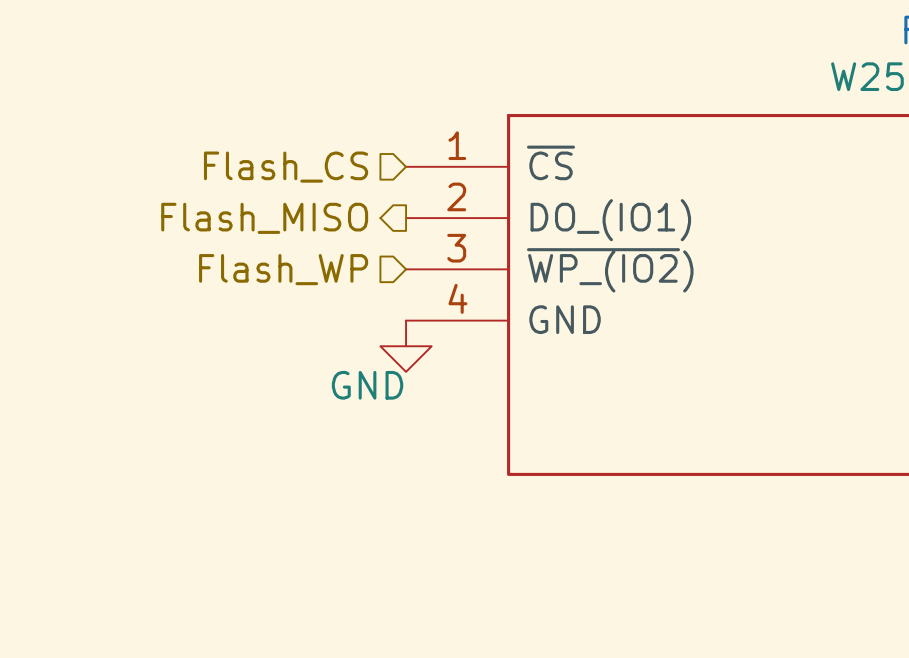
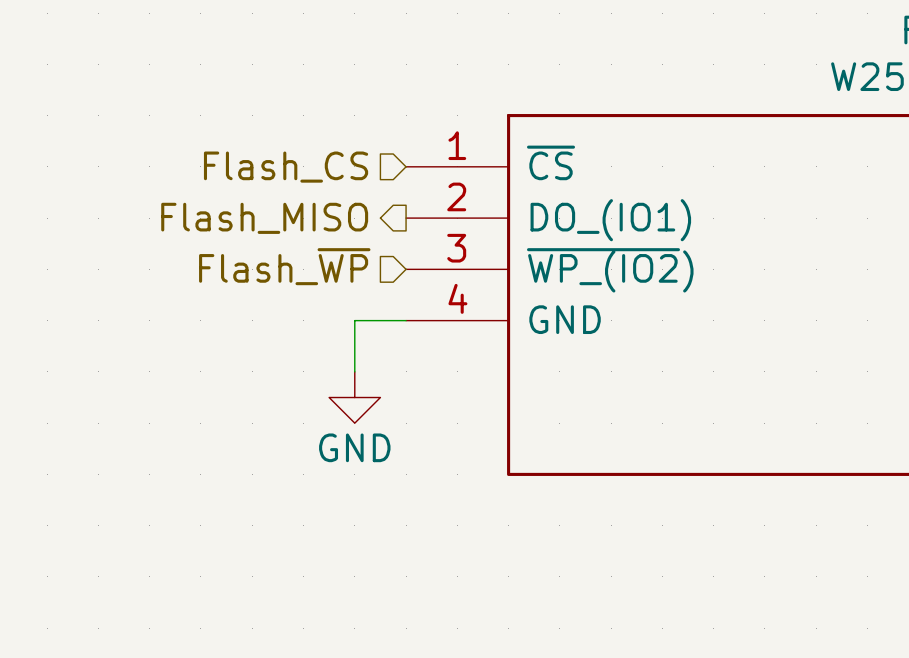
hierarchical label: Flash_WP (283, 269) -> Flash_~{WP} (284, 266)
wire: none -> (406, 320) (354, 320) (354, 371)
power symbol position: GND (406, 346) -> GND (354, 397)
power symbol text position: GND (367, 385) -> GND (354, 447)

